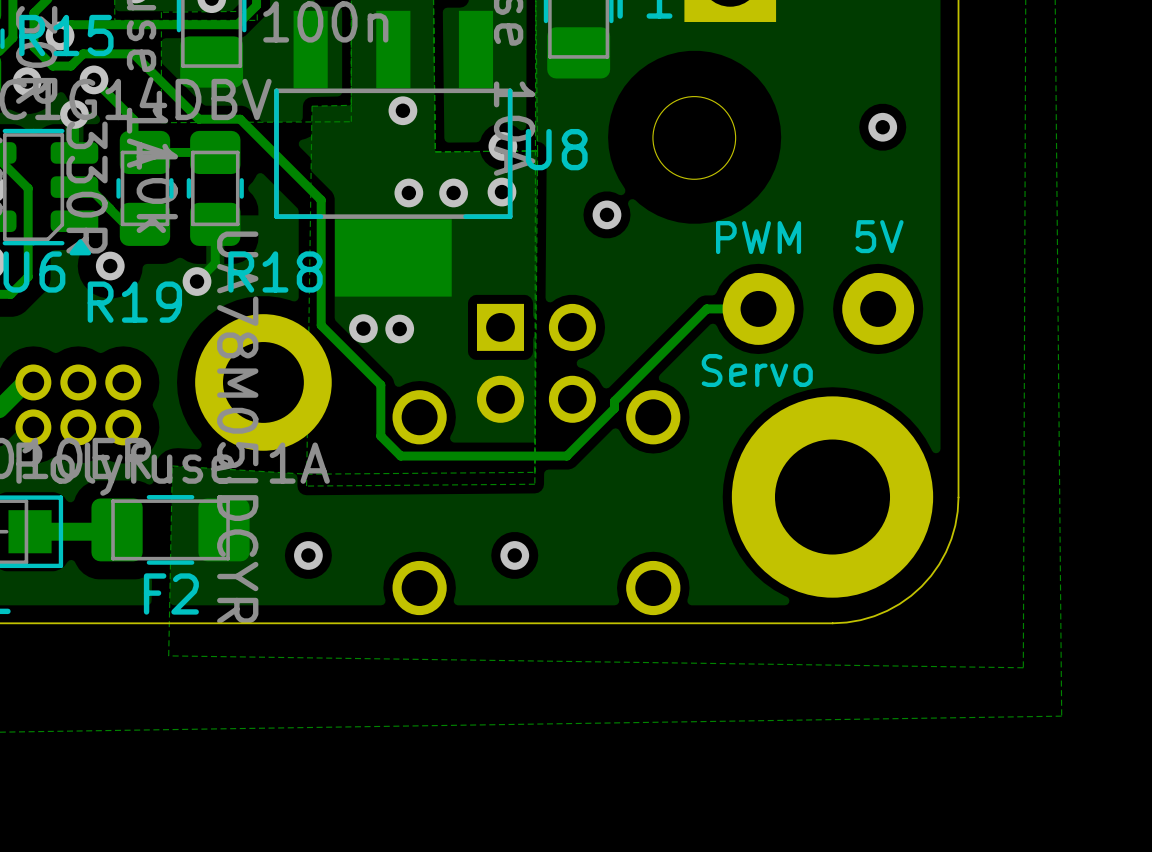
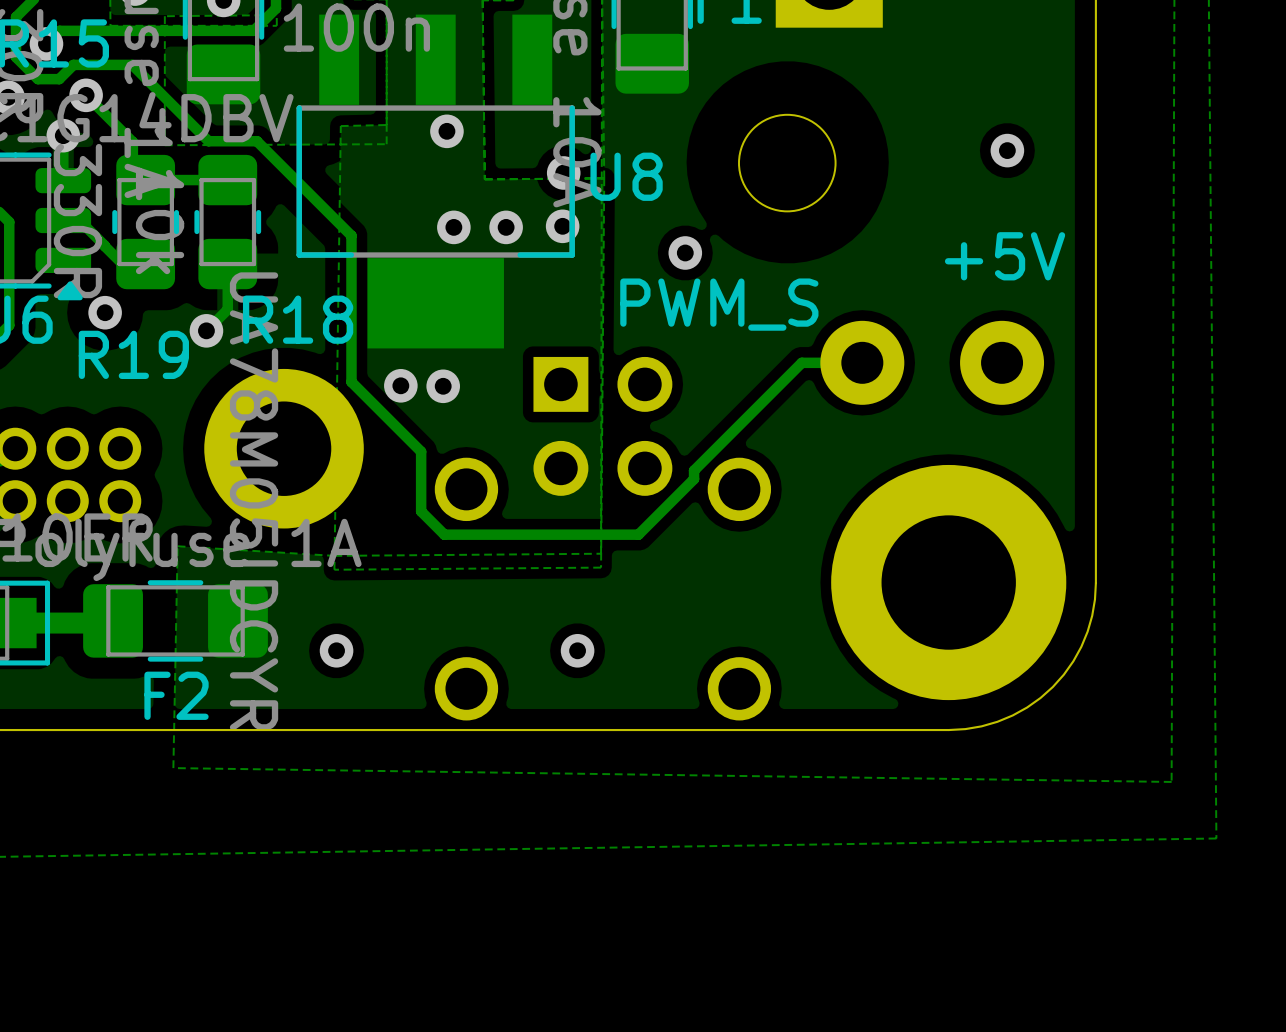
5V name: 5V (879, 236) -> +5V (1005, 256)
PWM name: PWM (758, 237) -> PWM_S (719, 304)
text: Servo (757, 370) -> none

